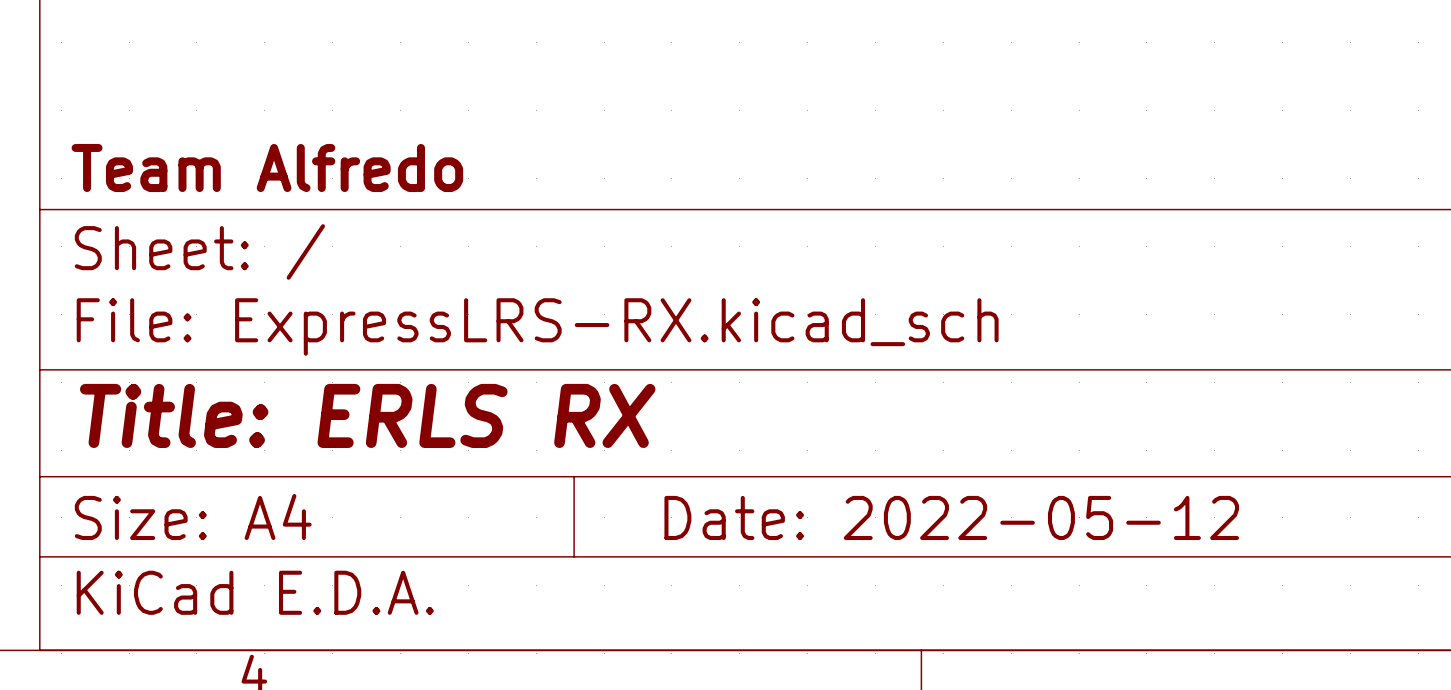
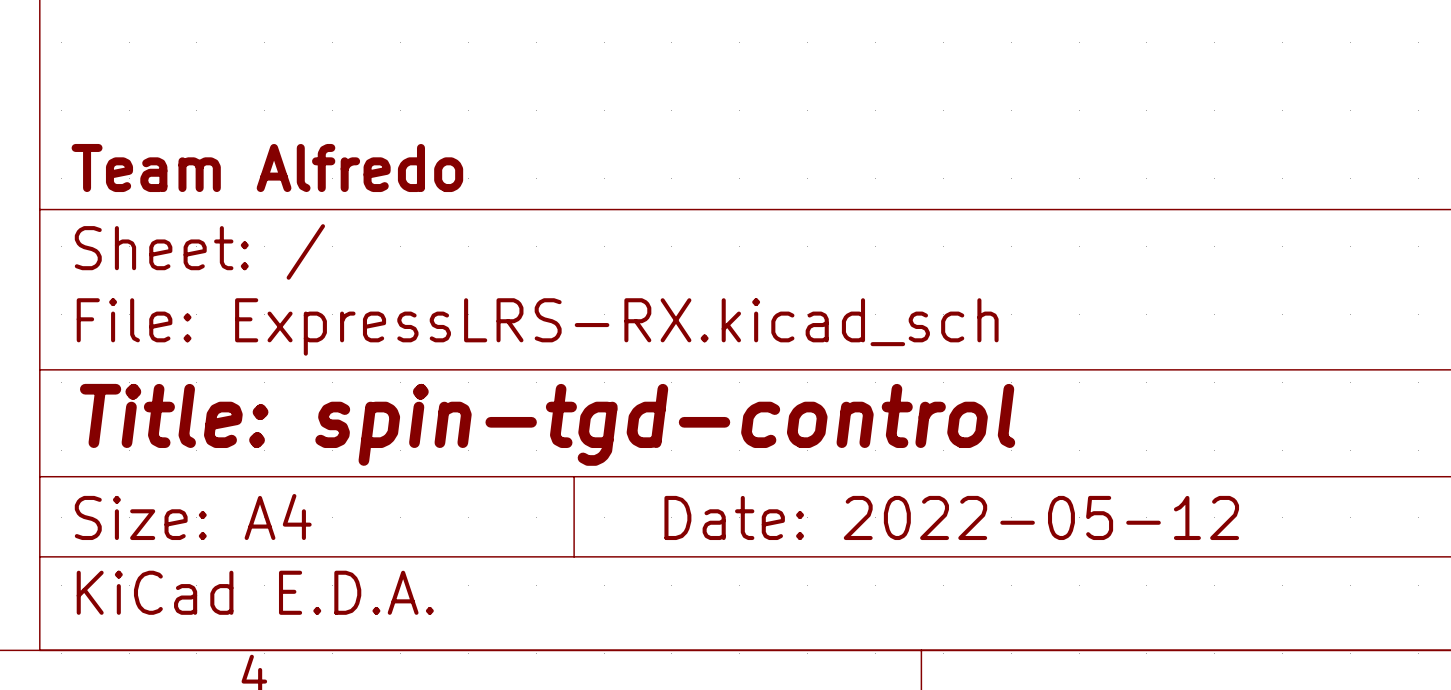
title block: Title: ERLS RX (367, 415) -> Title: spin-tgd-control (547, 424)

